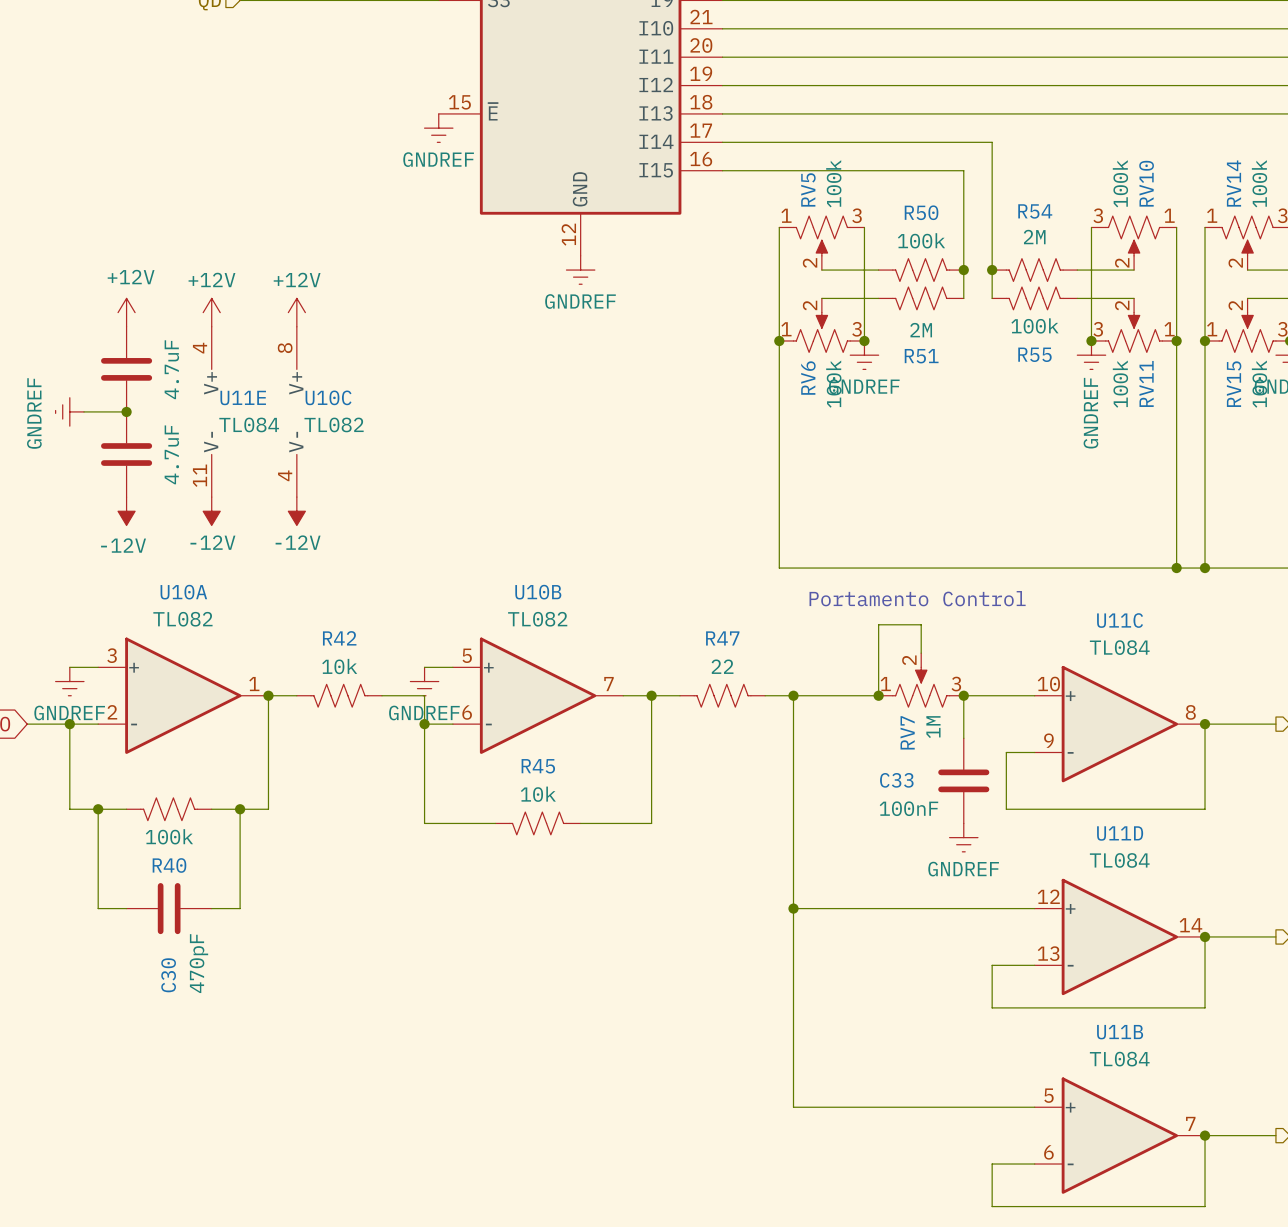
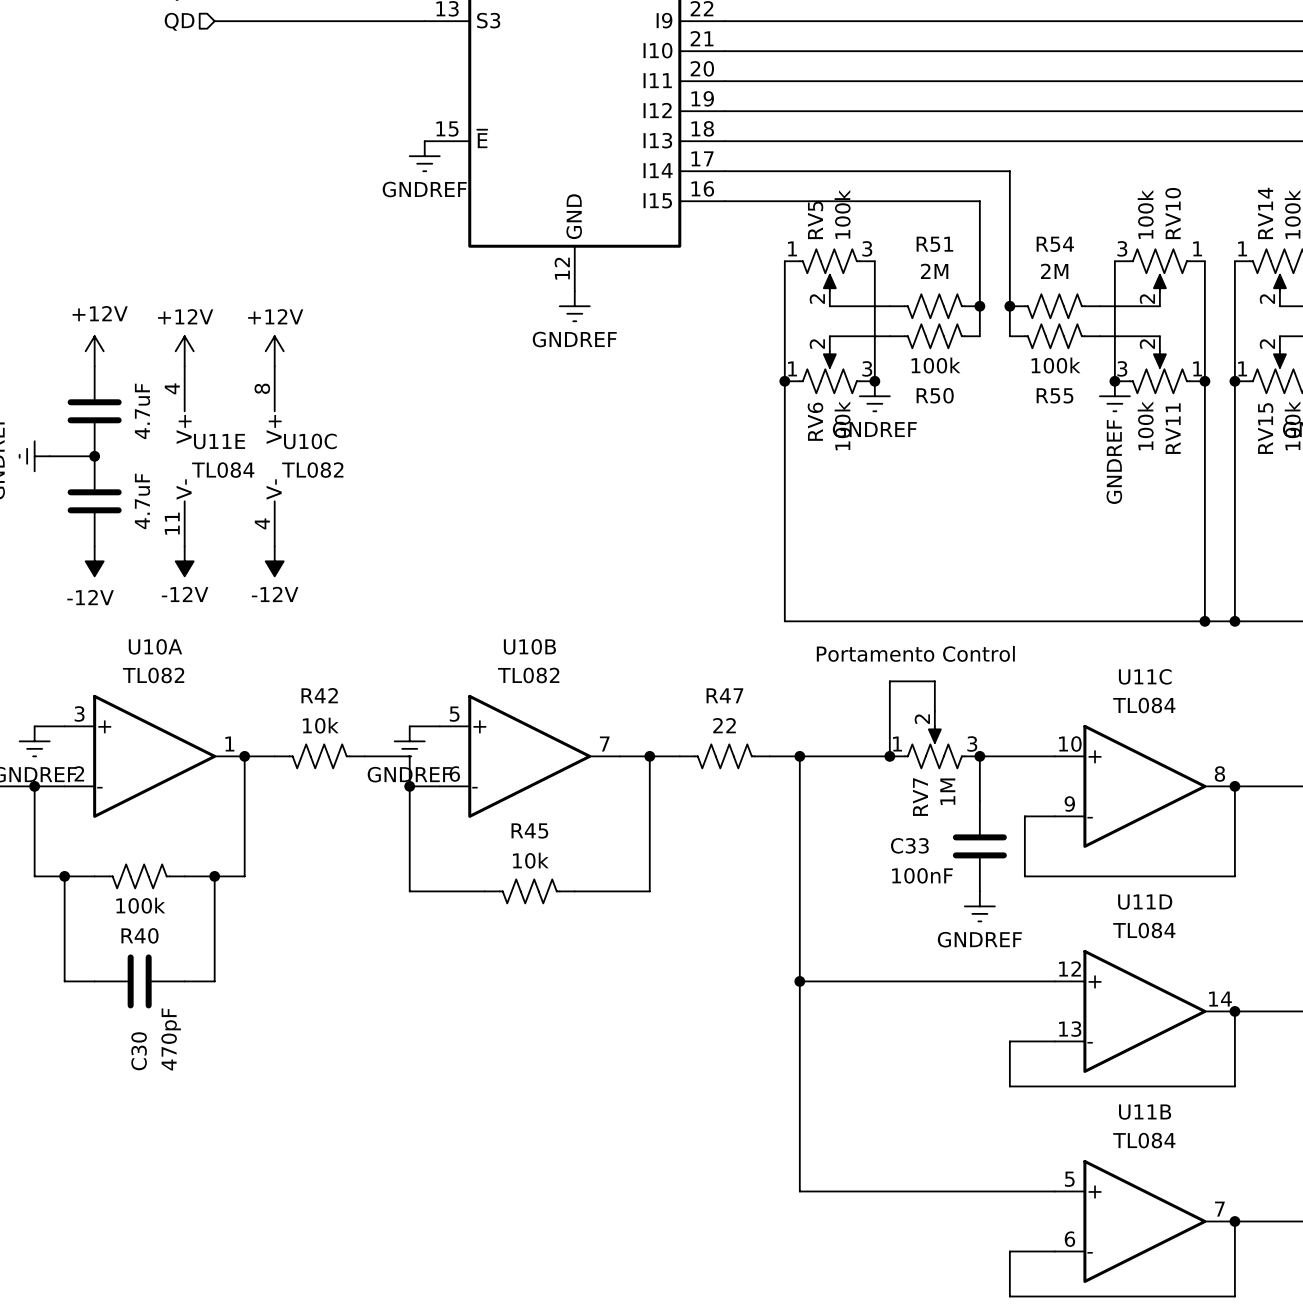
R50 name: R50 (921, 212) -> R51 (934, 244)
R50 value: 100k (921, 240) -> 2M (934, 271)
R51 value: 2M (921, 330) -> 100k (935, 365)
R51 name: R51 (921, 356) -> R50 (935, 395)

